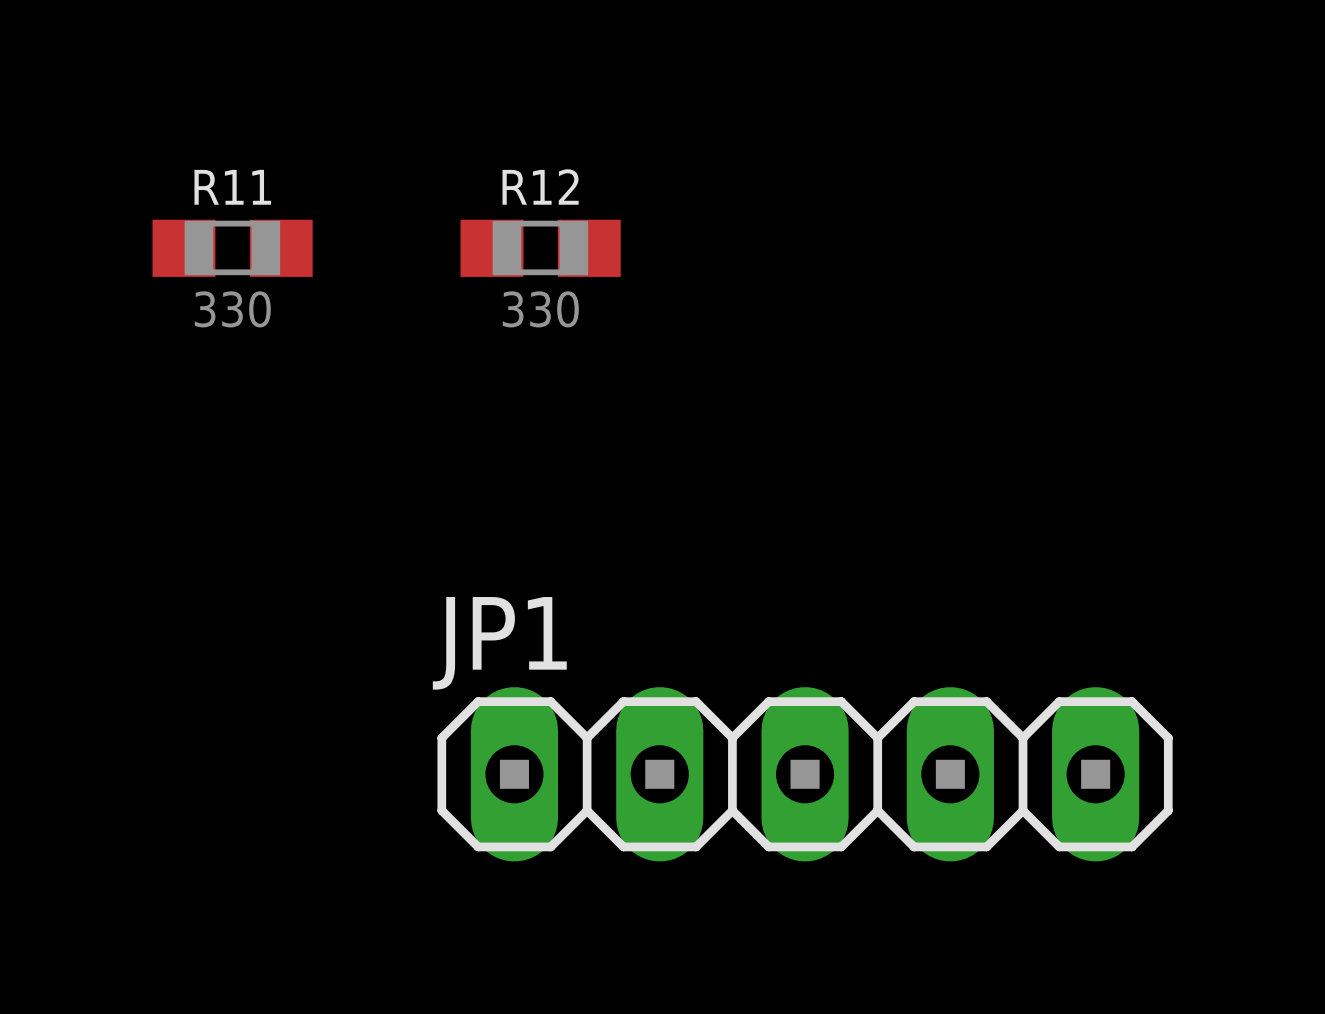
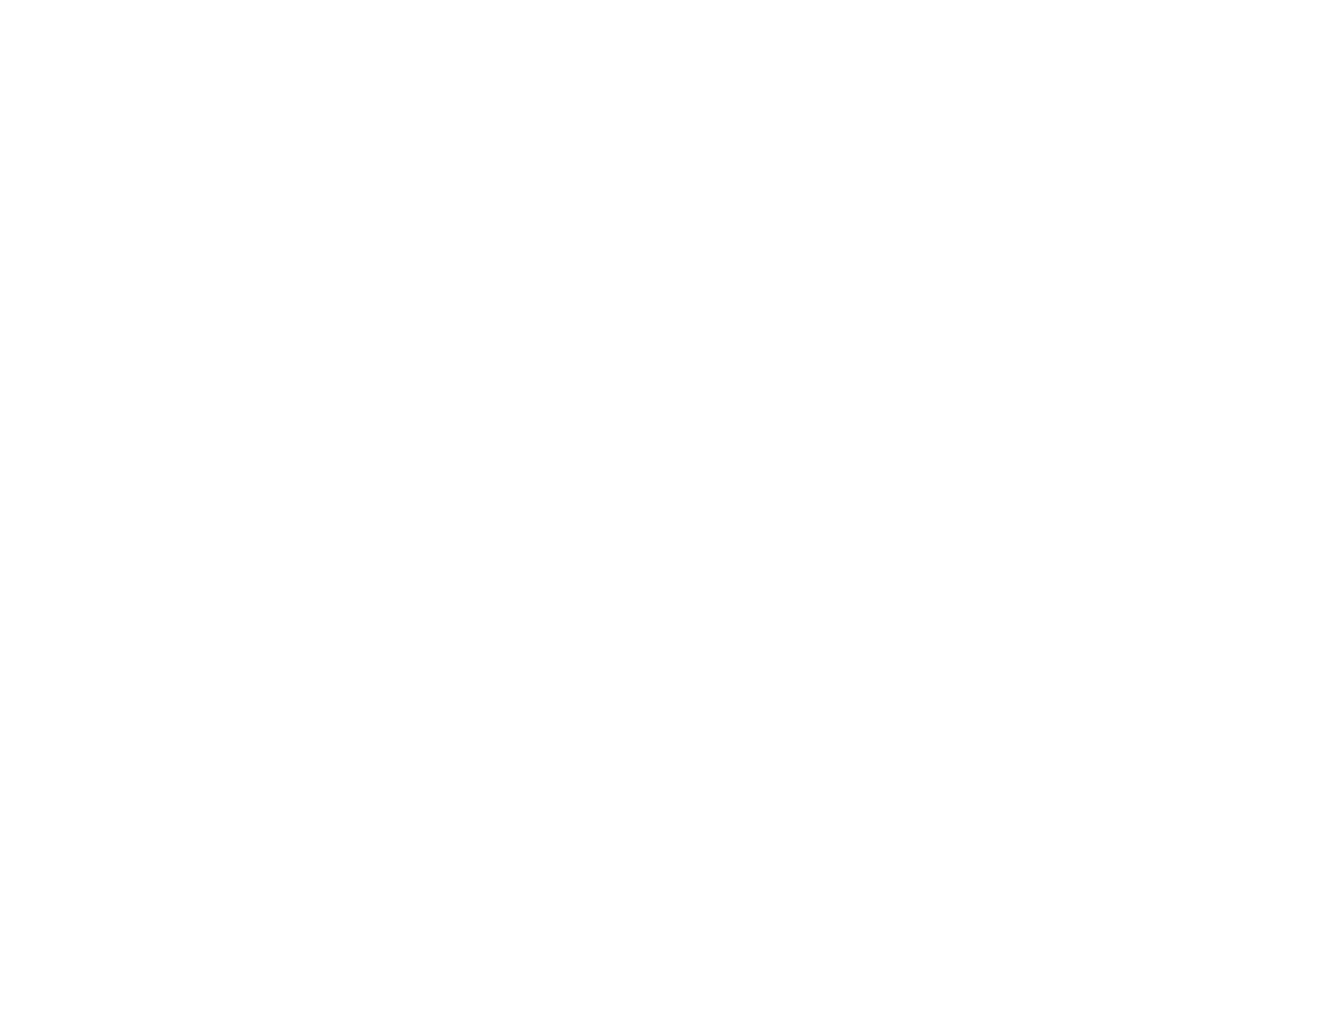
R11: 330 (232, 248) -> none
R12: 330 (540, 248) -> none
JP1: (805, 774) -> none

